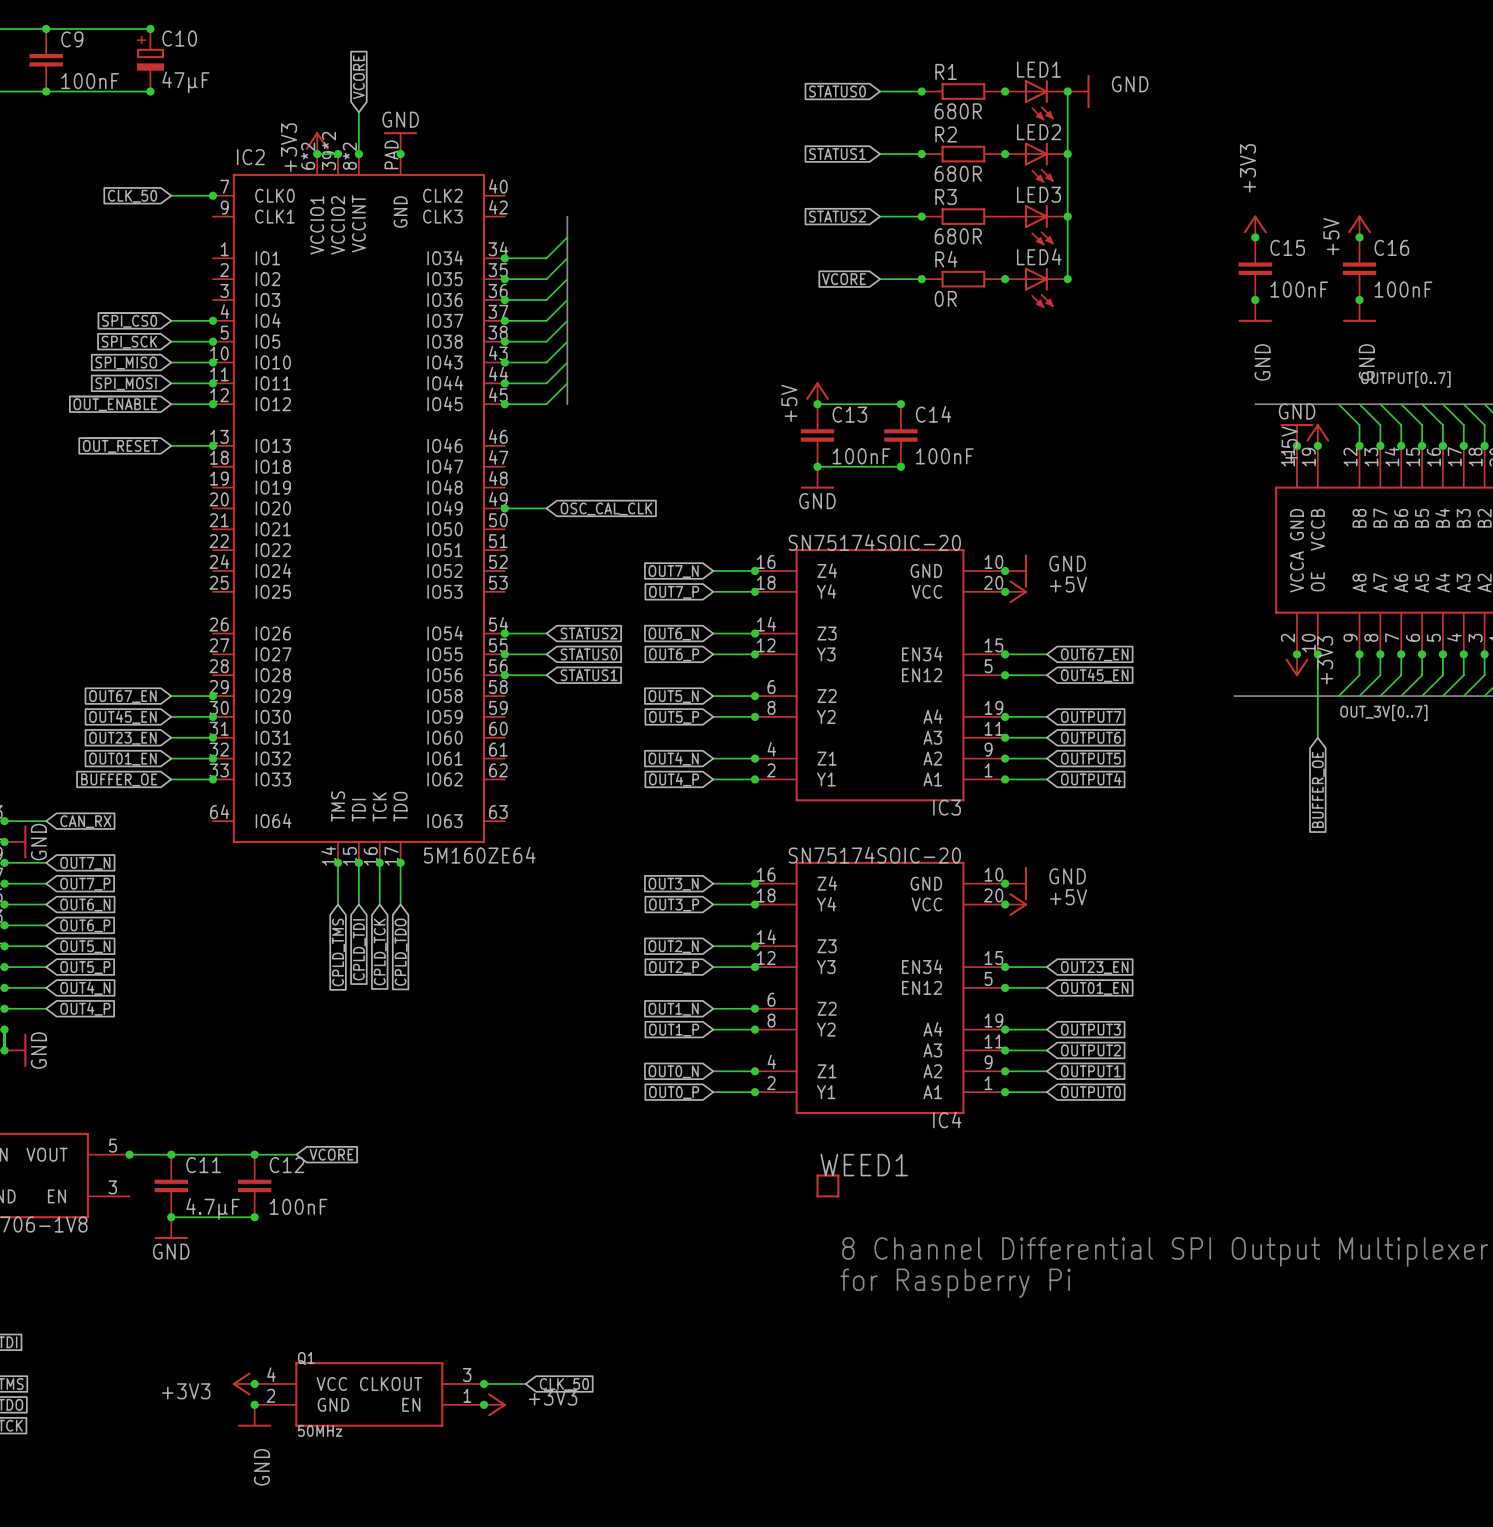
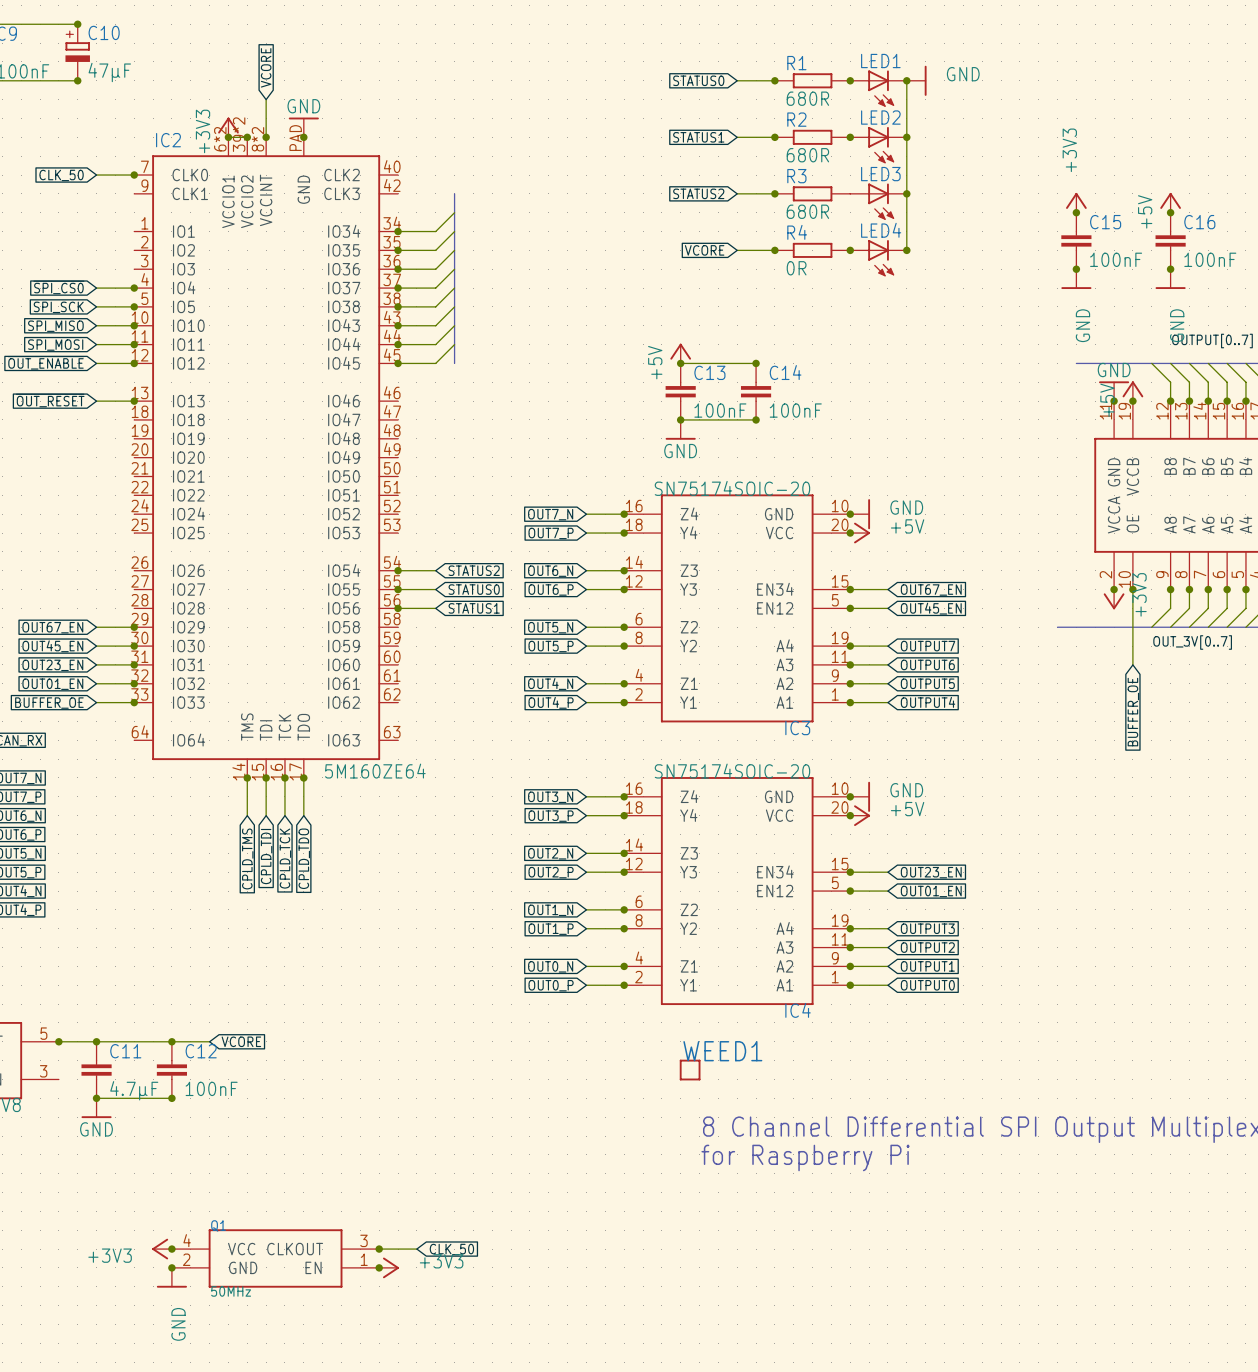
wire: (504, 508) (546, 508) -> none
junction: (504, 508) -> none
global label: OSC_CAL_CLK (606, 508) -> none

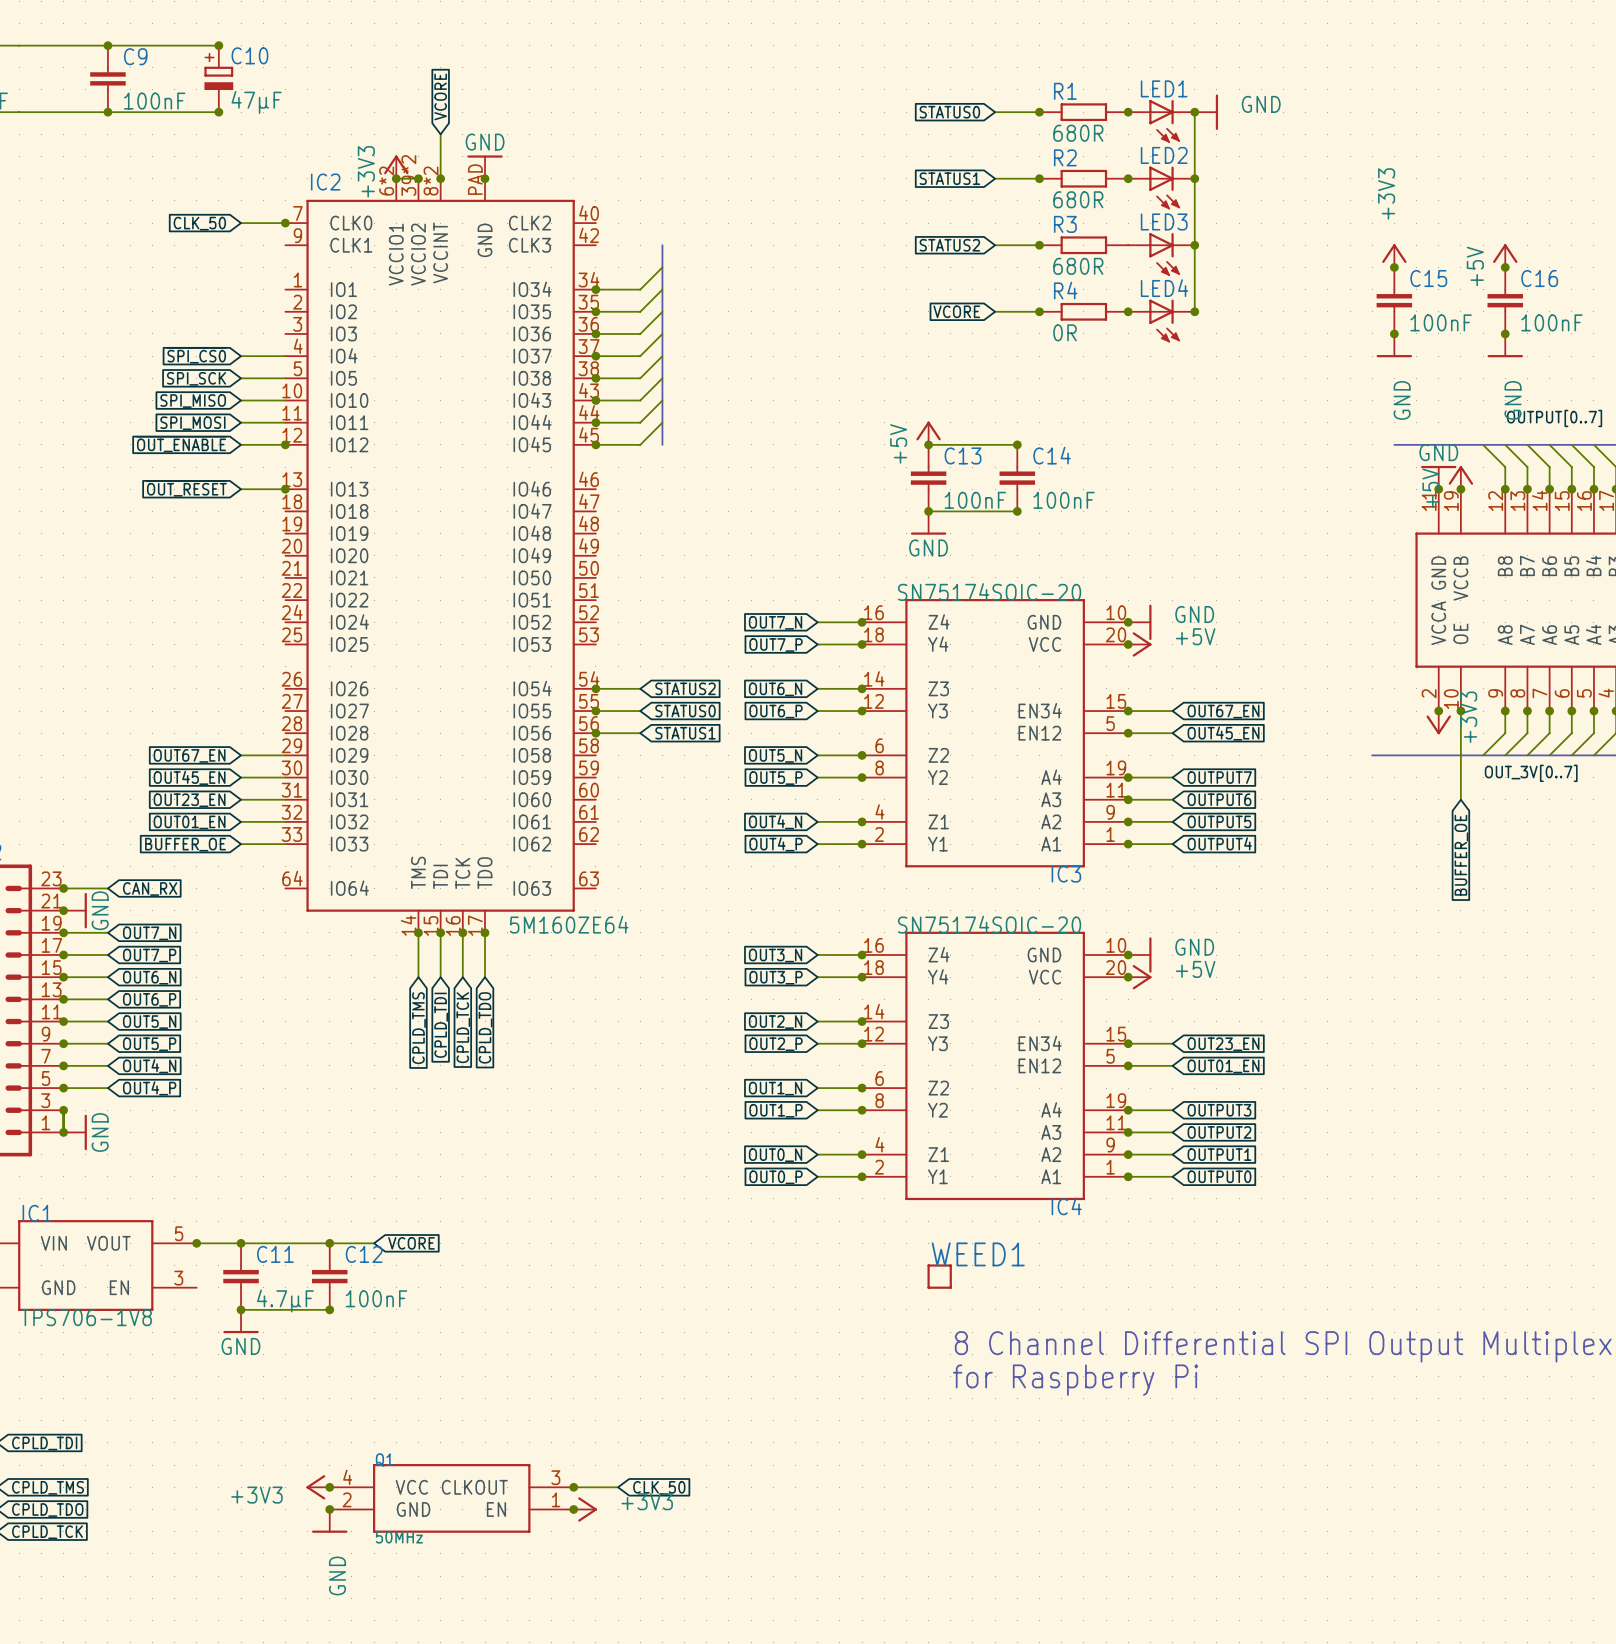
junction: (134, 288) -> none
junction: (134, 306) -> none
junction: (134, 325) -> none
junction: (134, 344) -> none
junction: (134, 627) -> none
junction: (134, 646) -> none
junction: (134, 664) -> none
junction: (134, 683) -> none
junction: (134, 702) -> none

